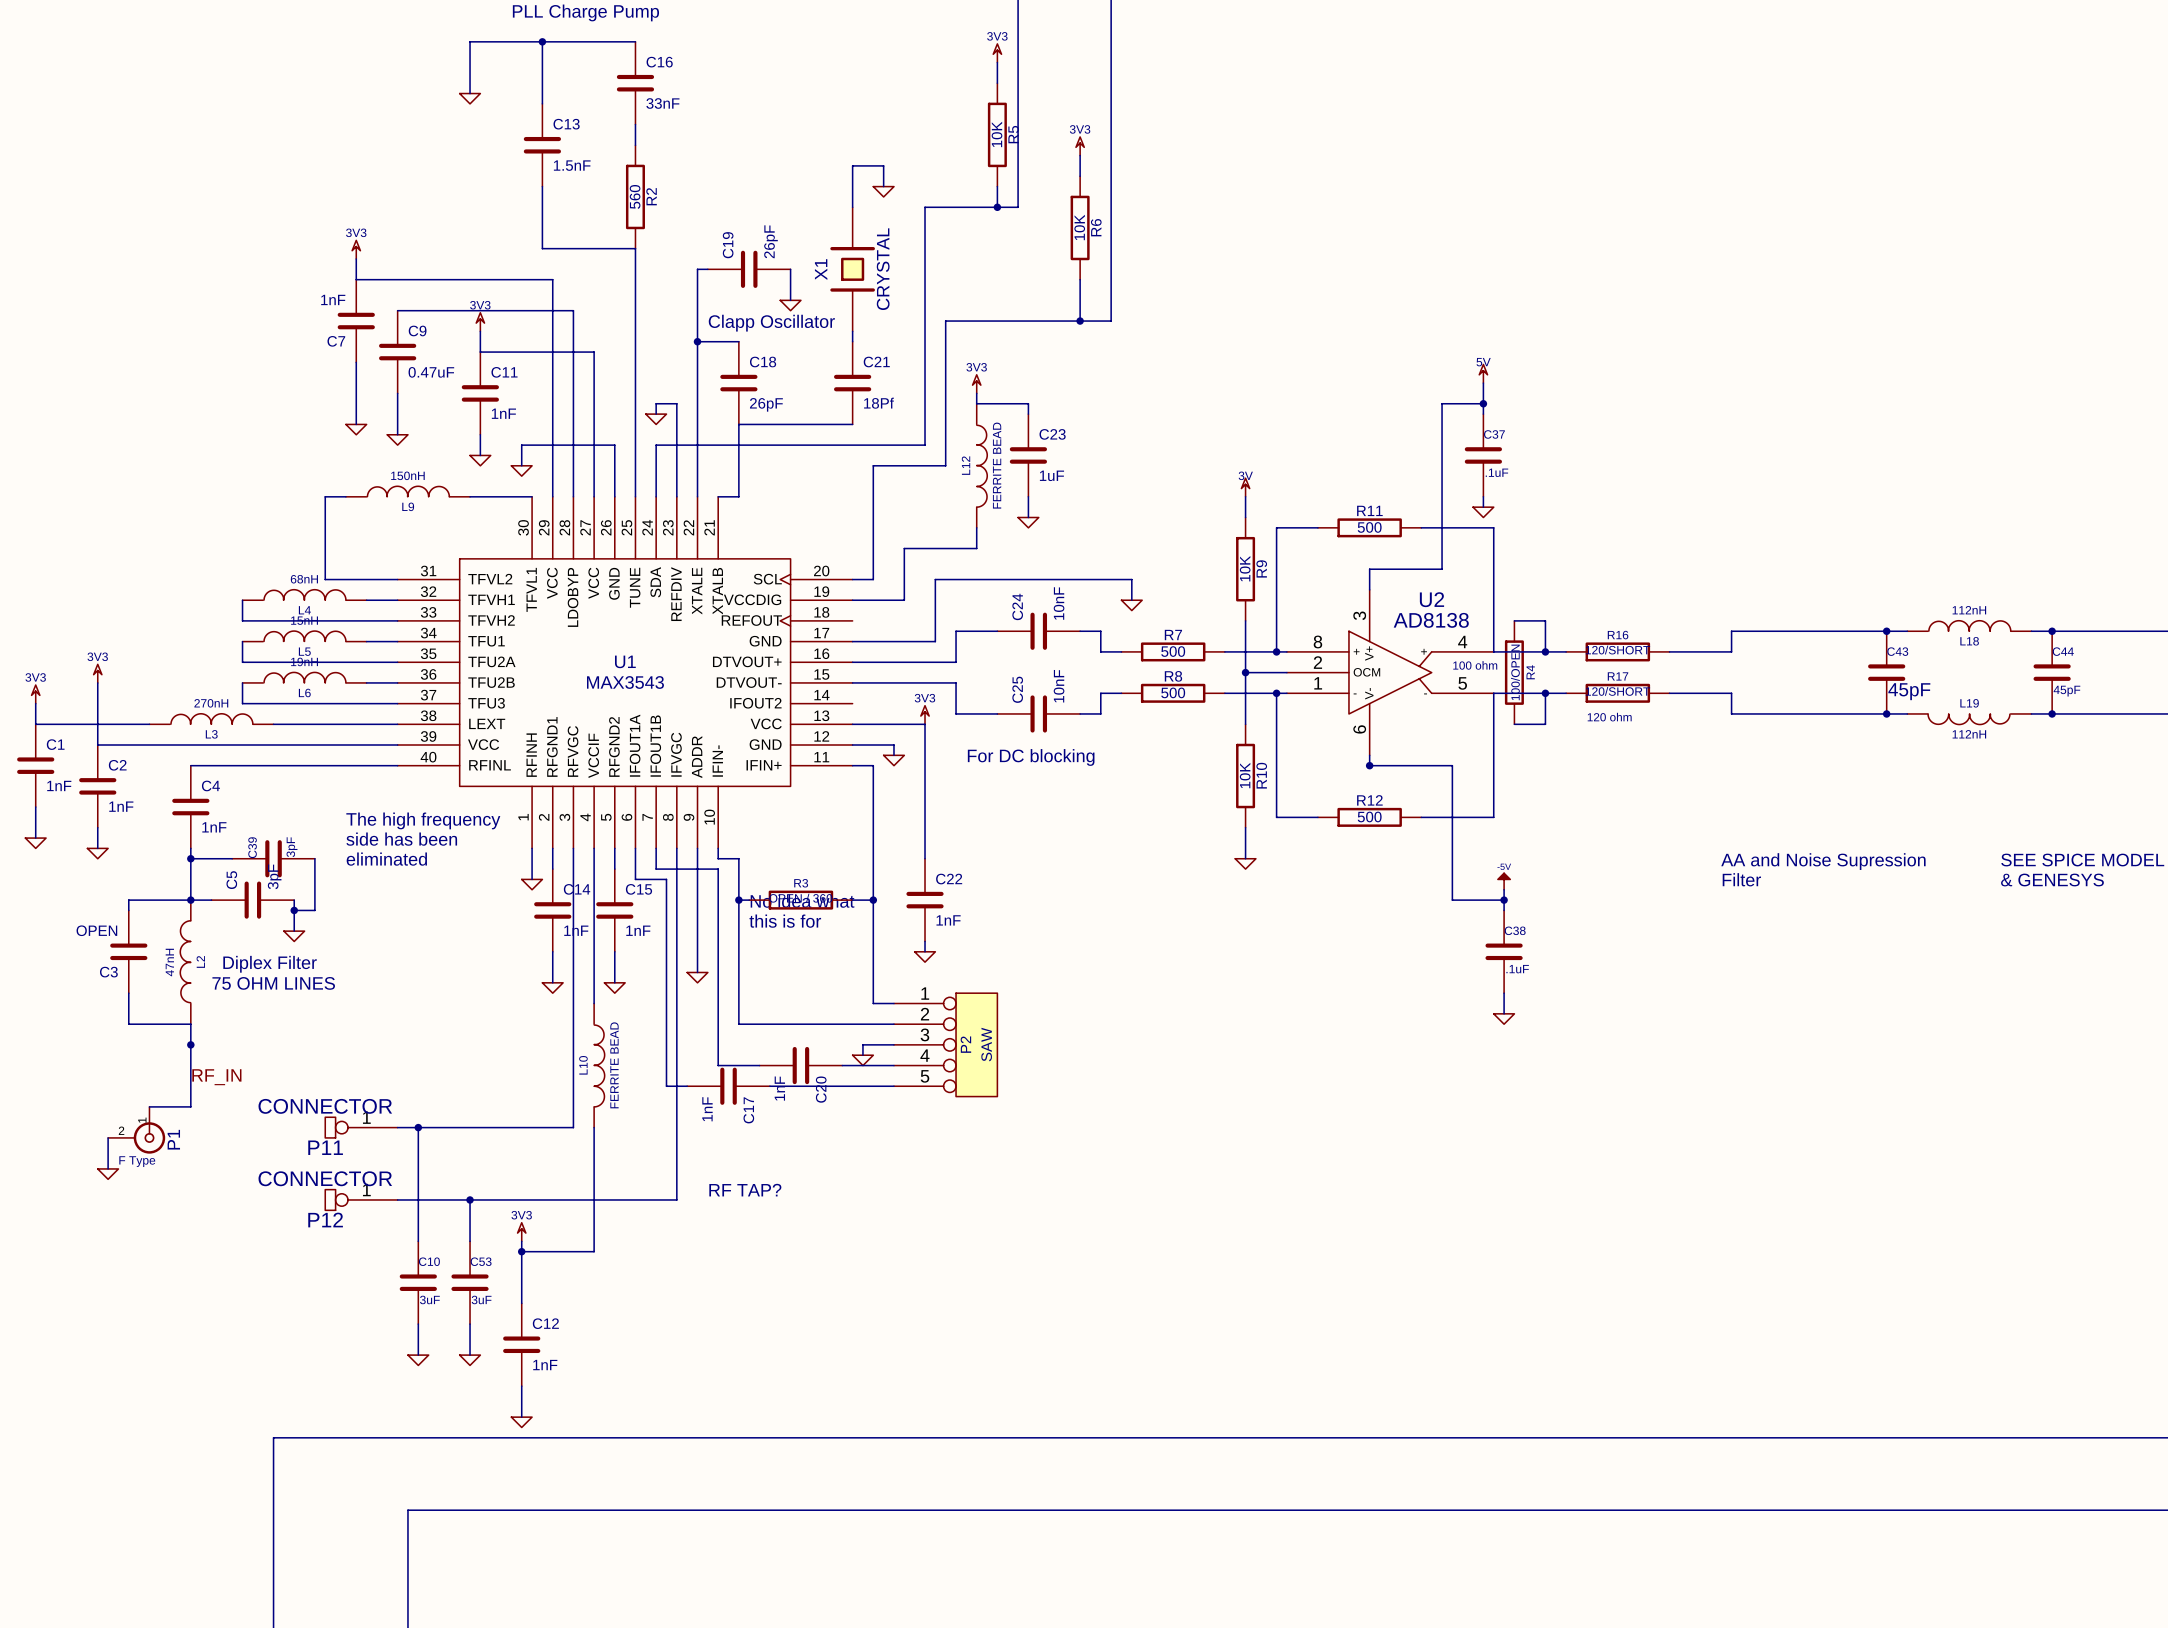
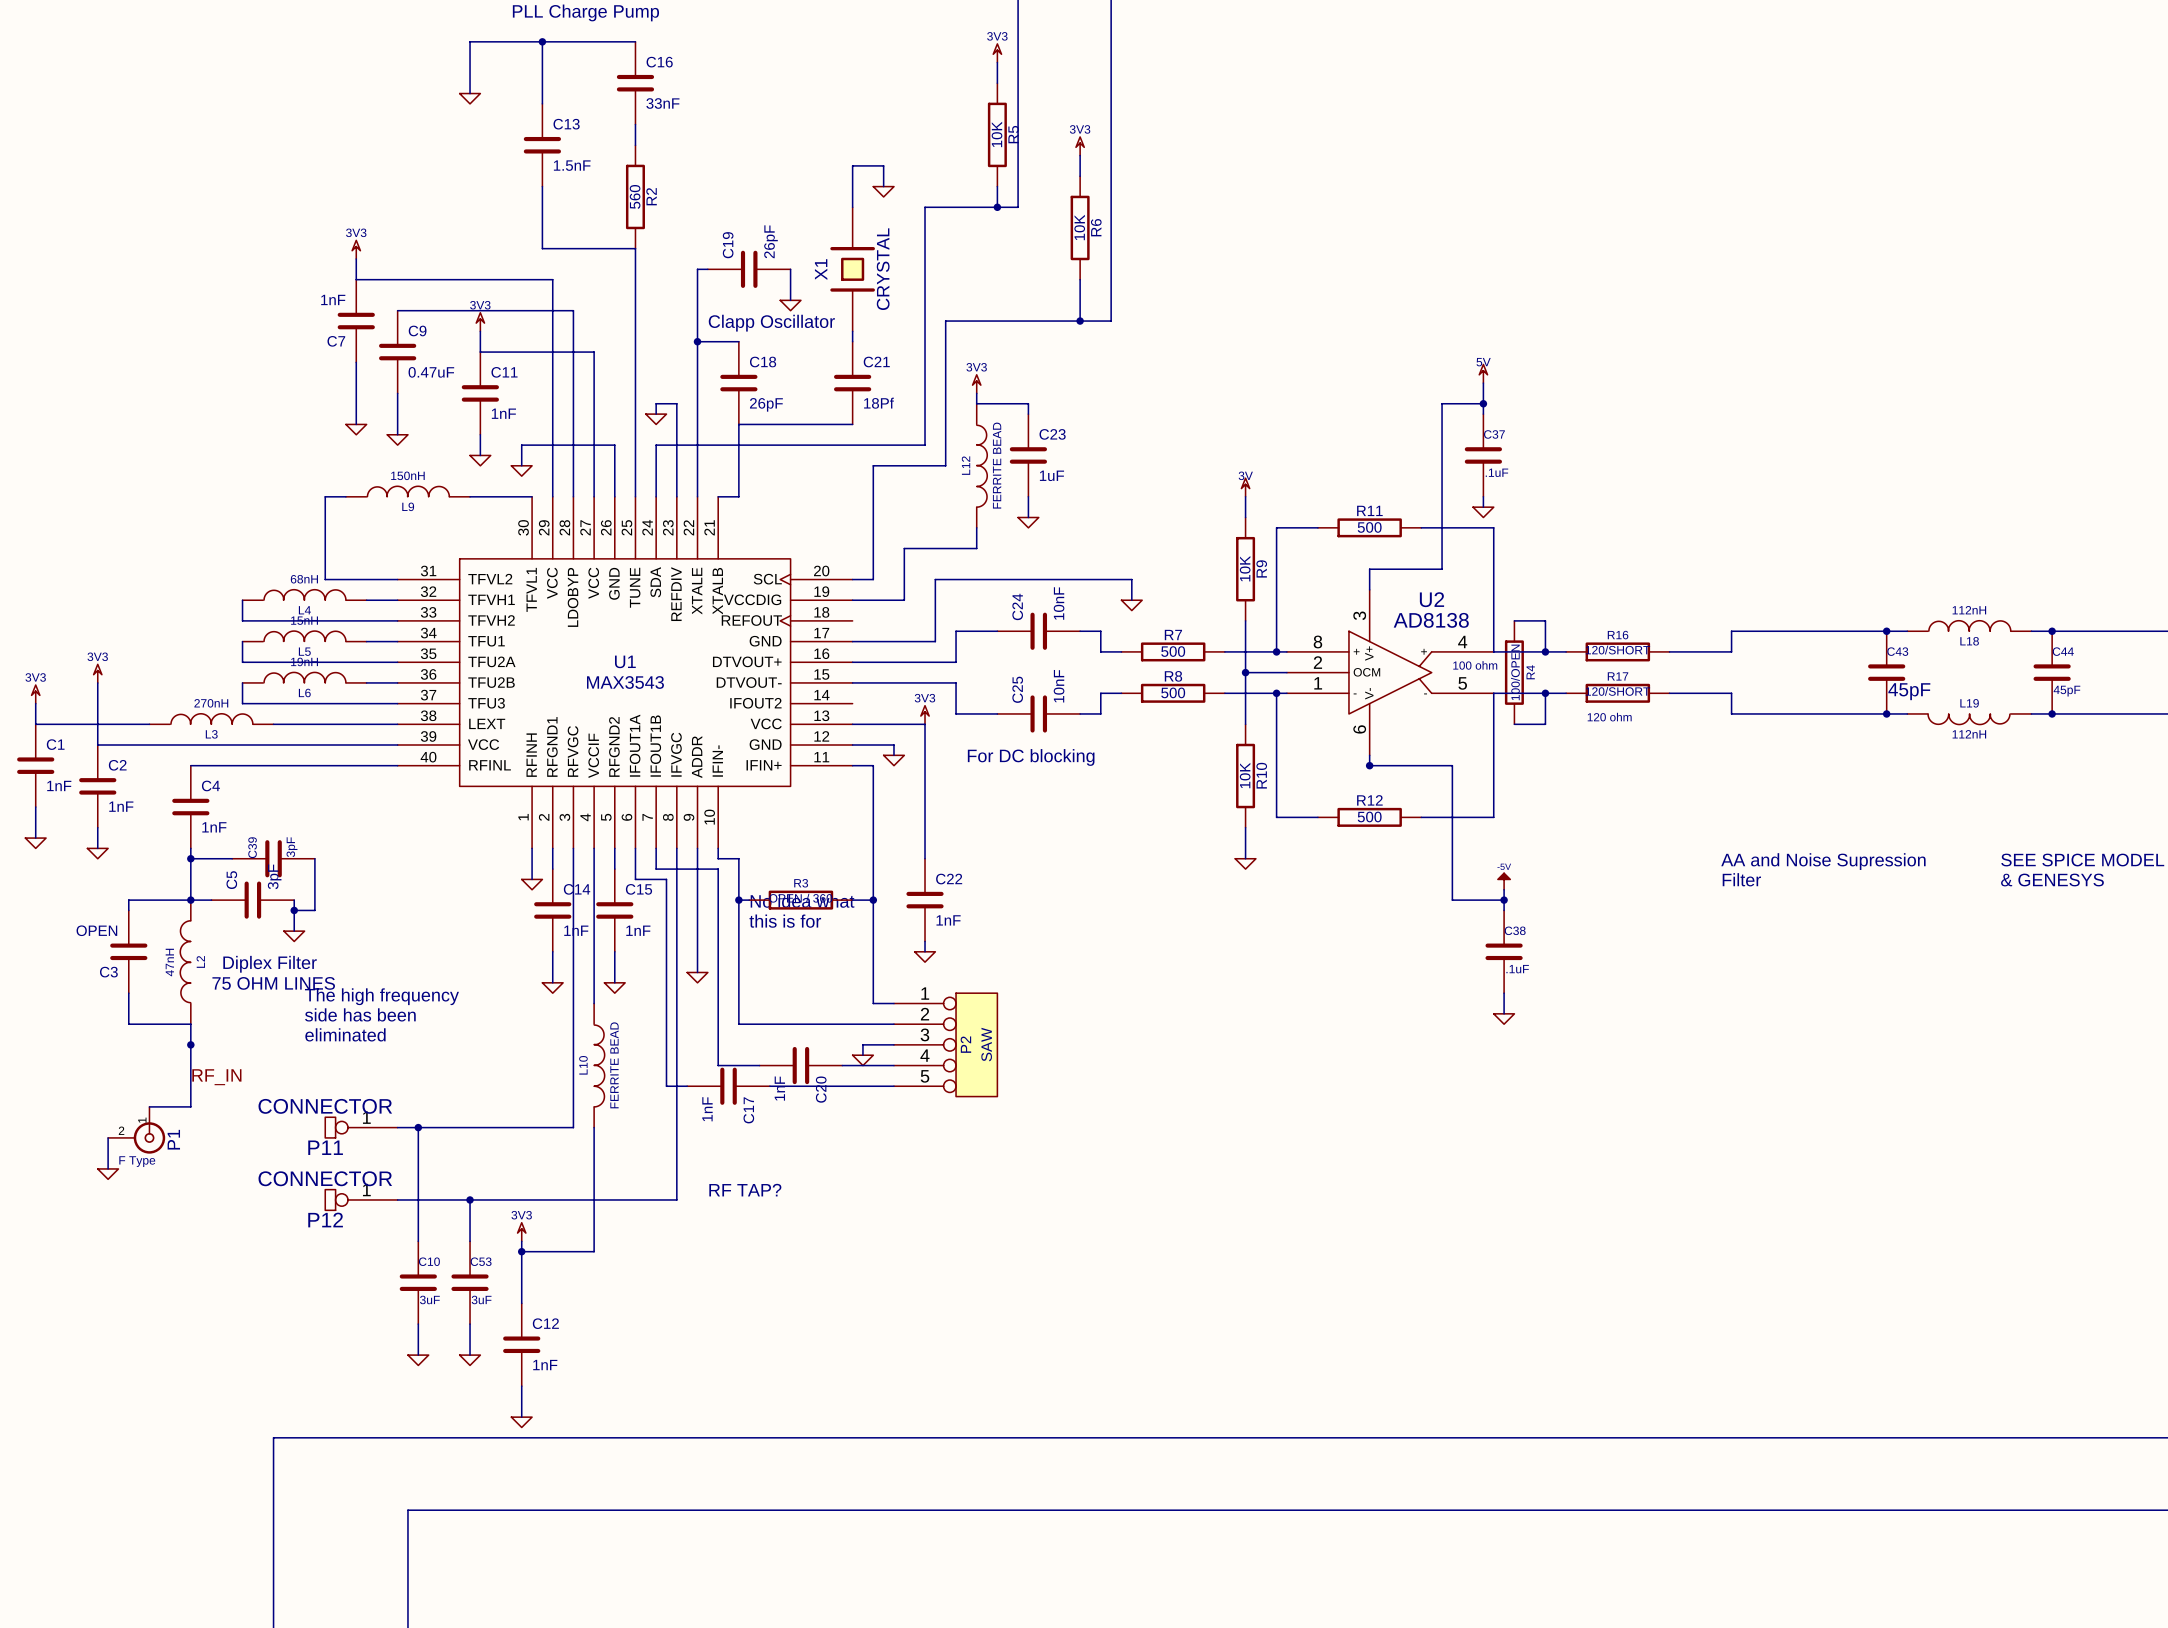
text position: The high frequency (423, 820) -> The high frequency (381, 996)
text position: side has been (401, 839) -> side has been (360, 1014)
text position: eliminated (386, 859) -> eliminated (345, 1034)

